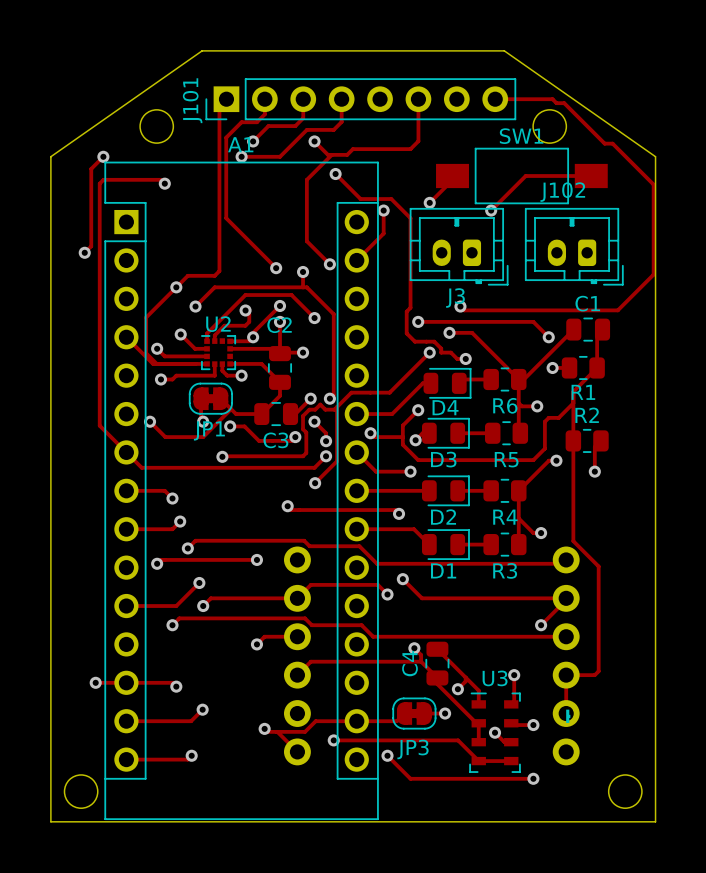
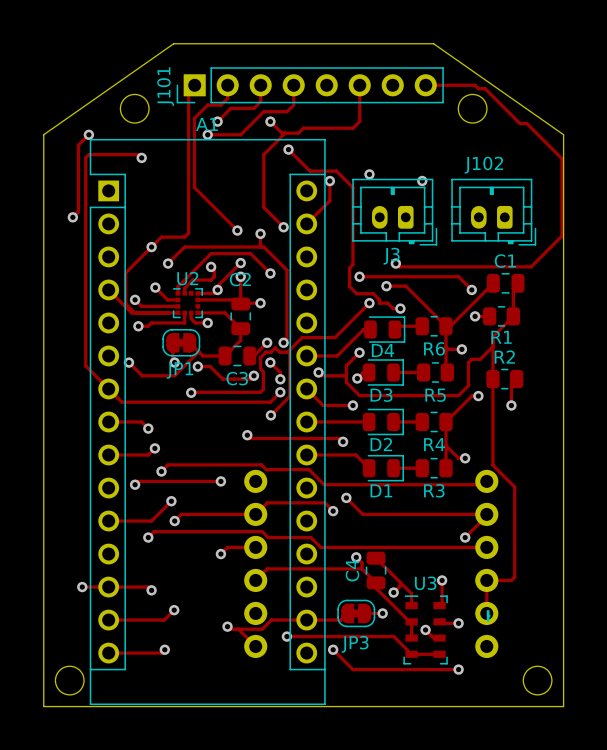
track: (452, 176) (452, 180) (429, 202) -> none
SW1: (521, 176) -> none
track: (591, 176) (525, 176) (491, 210) -> none

